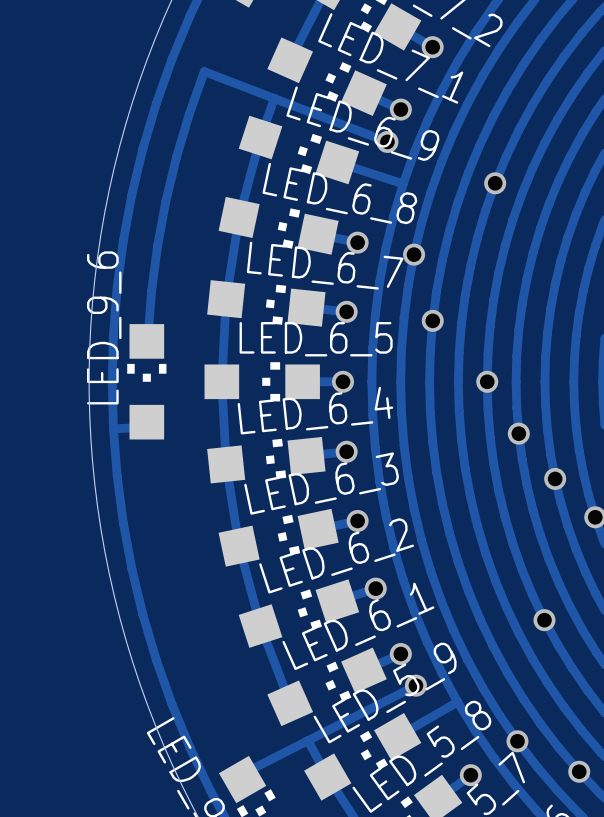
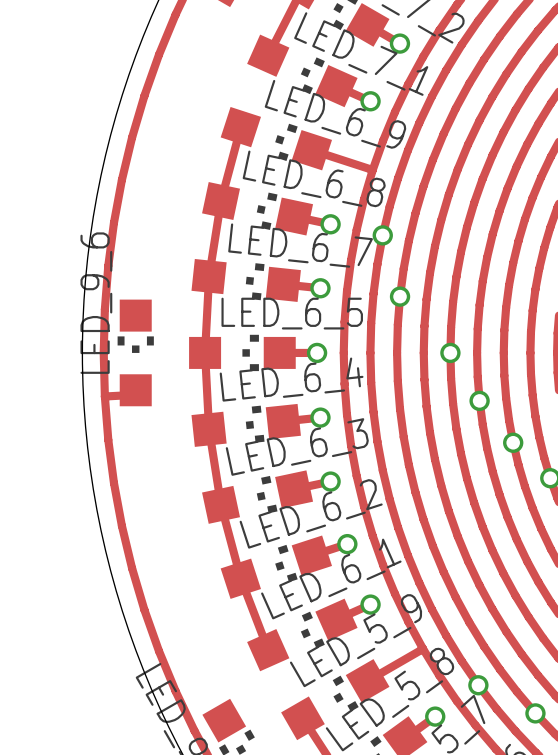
track: (274, 98) (260, 137) -> none
track: (387, 141) (204, 71) (176, 157) (165, 201) (157, 246) (146, 341) -> none
via: (387, 141) -> none
via: (495, 183) -> none
via: (544, 620) -> none
track: (415, 685) (241, 774) (242, 779) -> none
via: (415, 685) -> none
track: (307, 740) (327, 776) -> none

